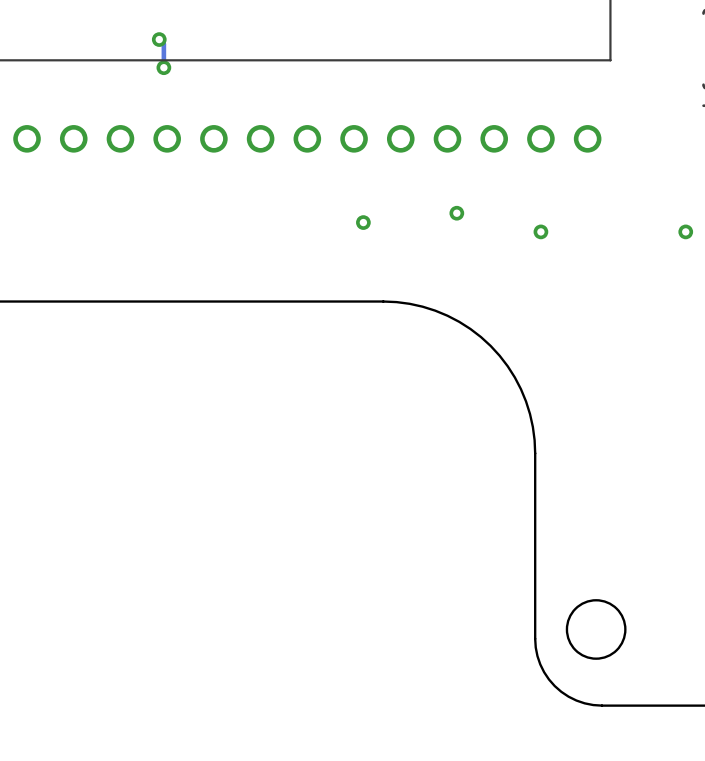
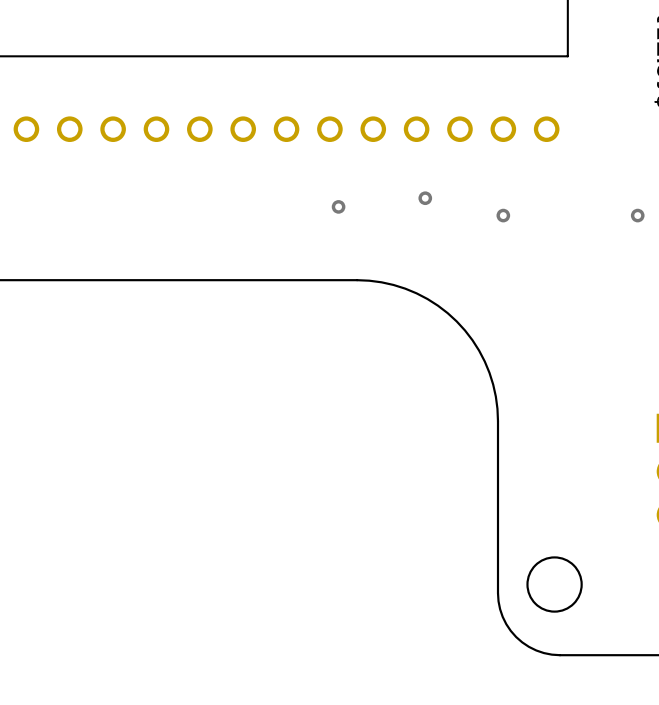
track: (159, 39) (163, 44) (163, 67) -> none
via: (159, 39) -> none
via: (163, 67) -> none

